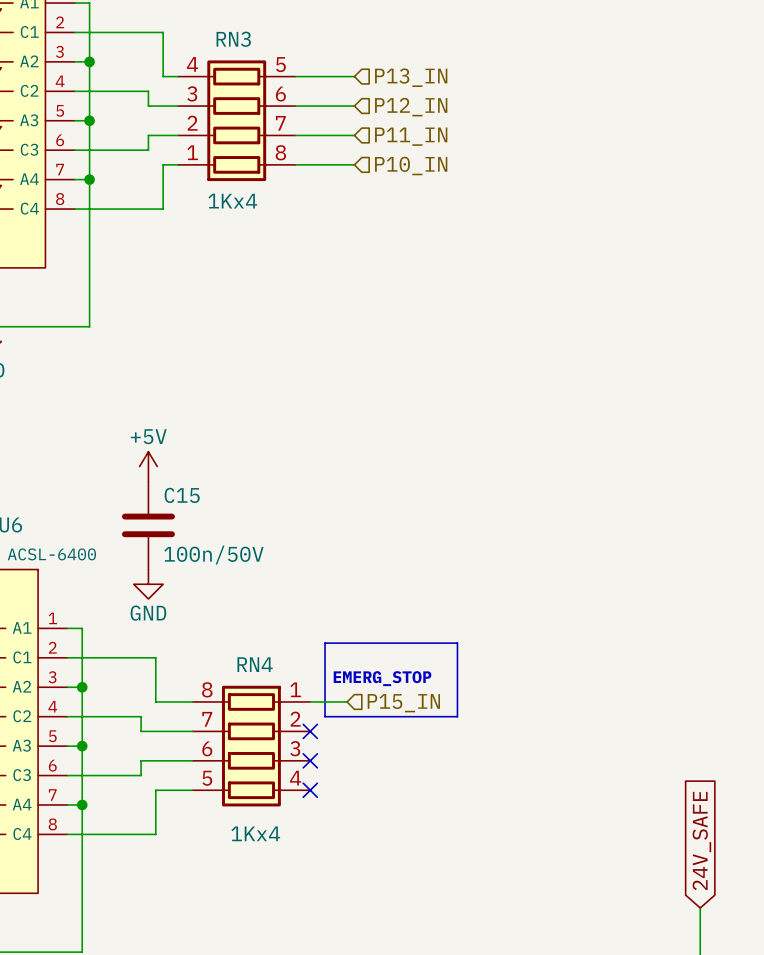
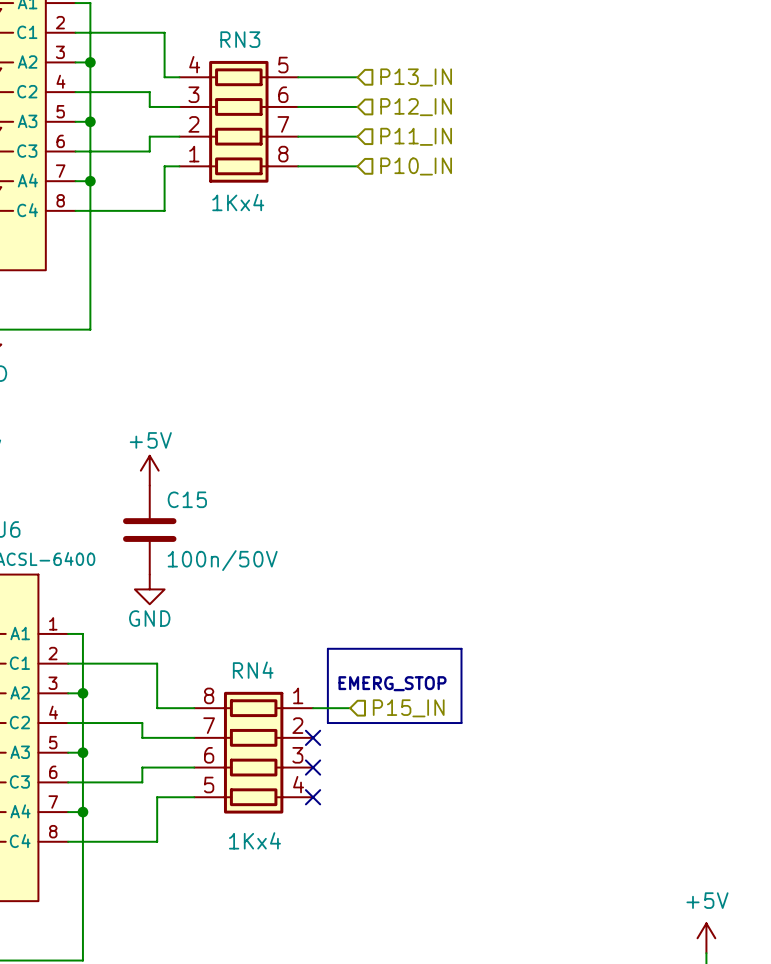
global label: 24V_SAFE (701, 840) -> none
power symbol: none -> +5V (706, 938)

